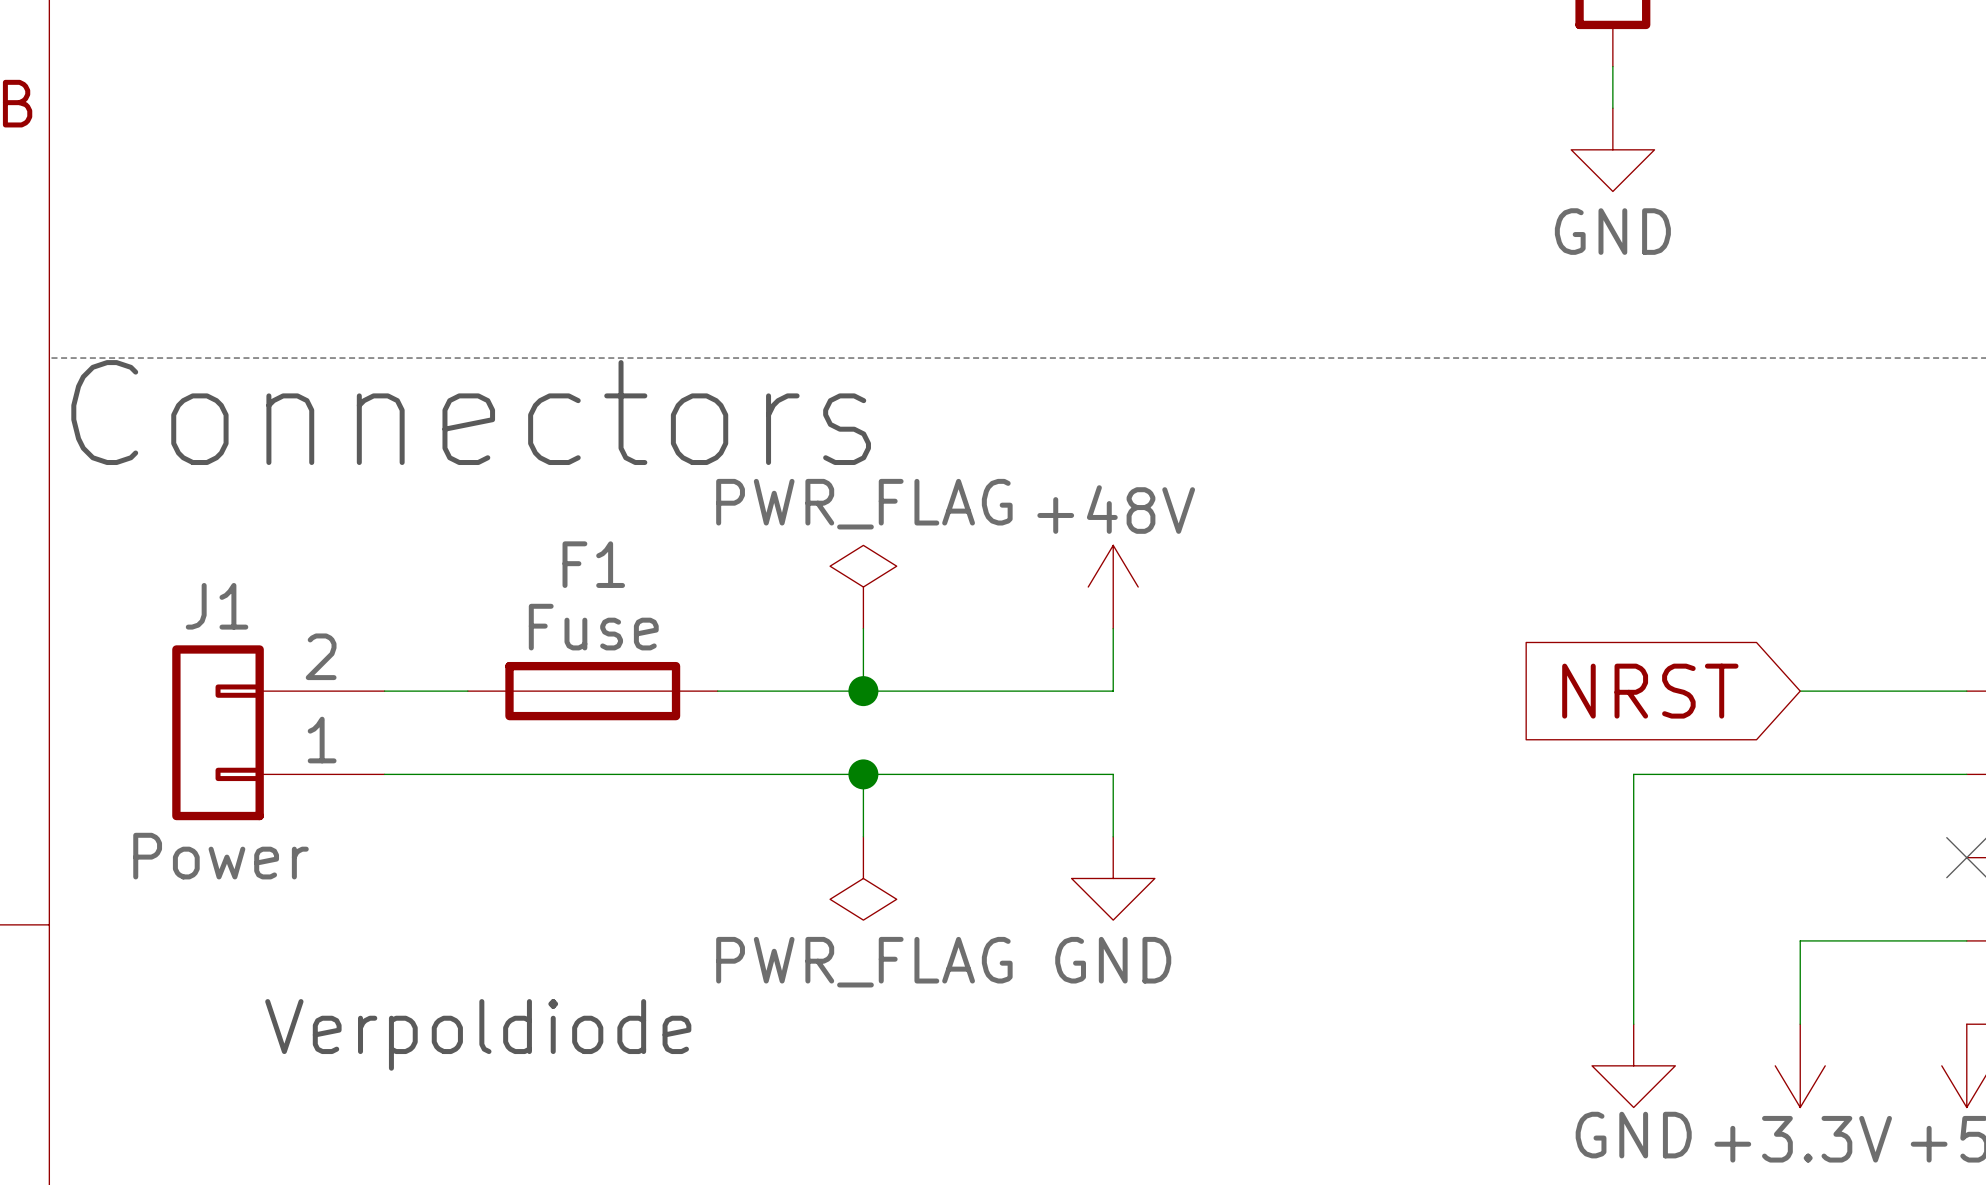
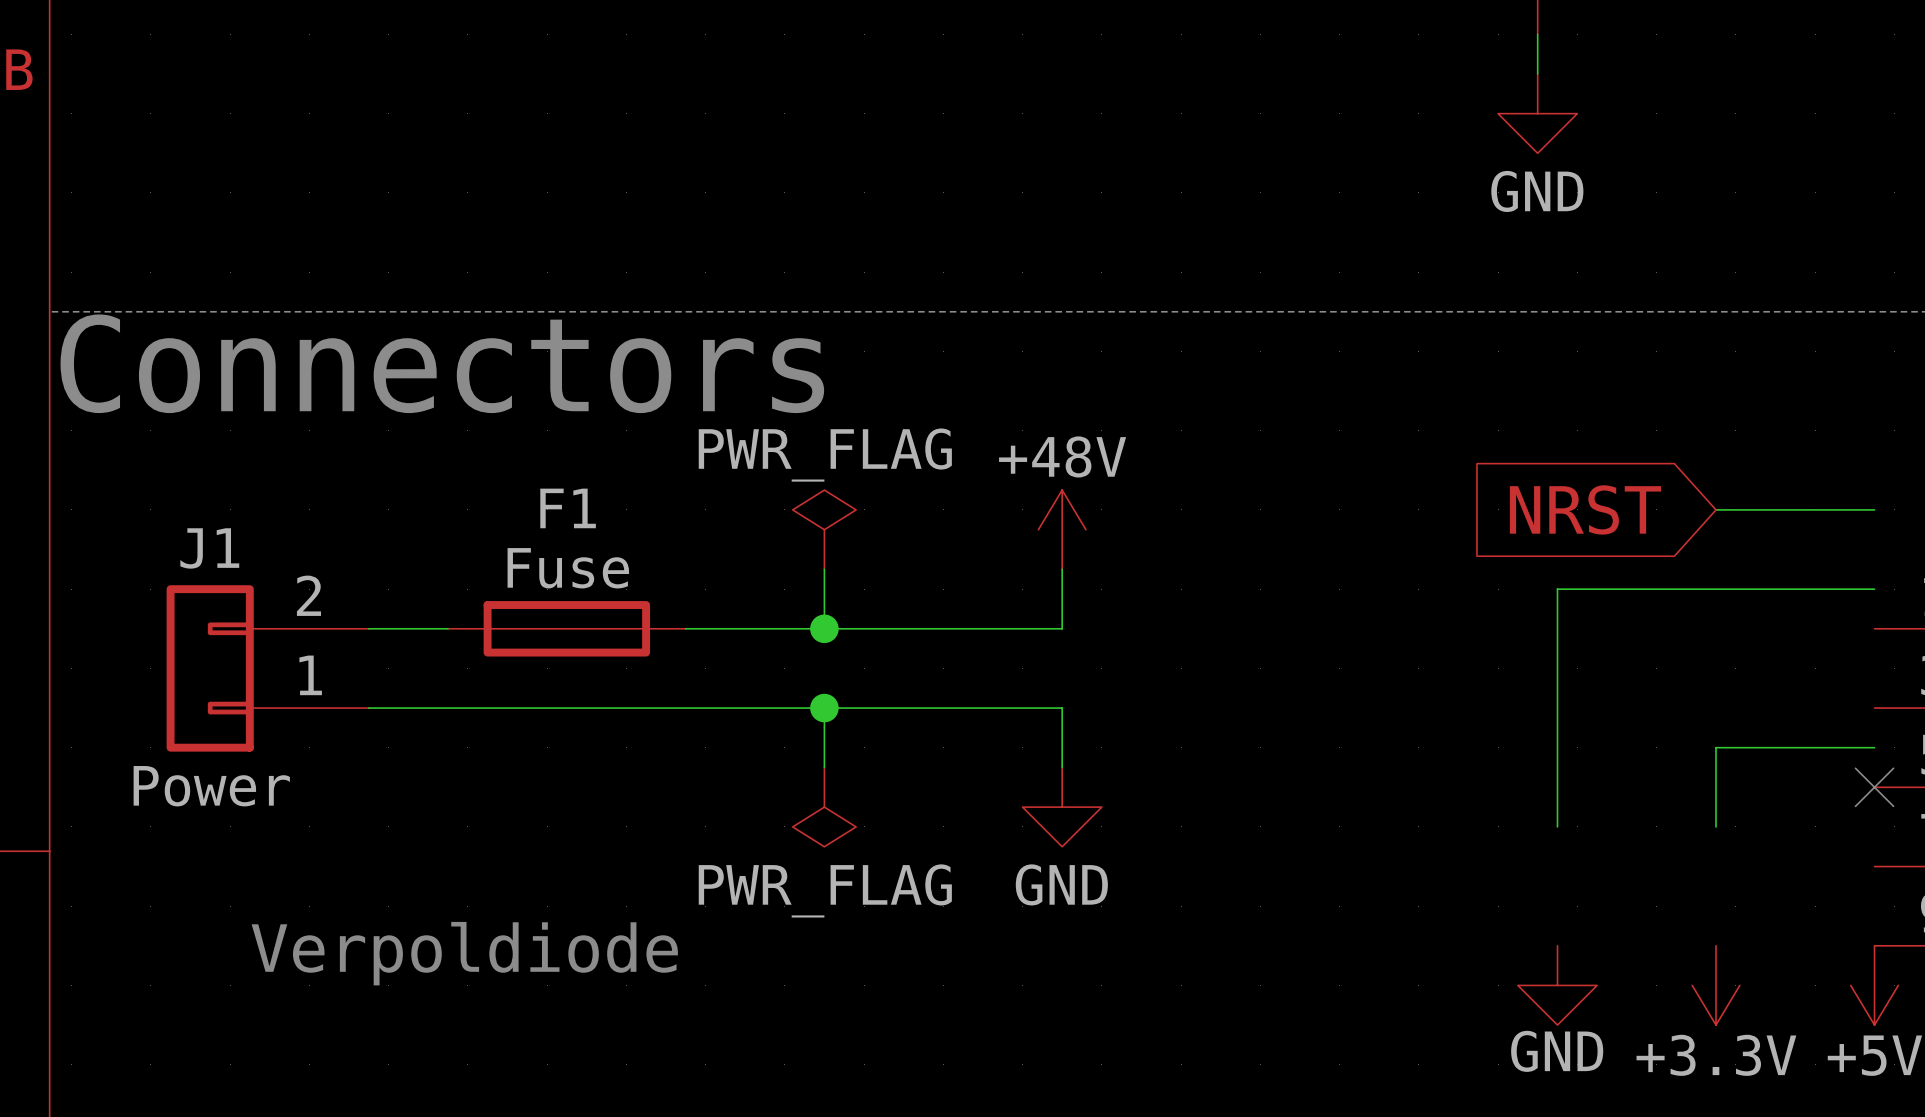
global label position: NRST (1650, 691) -> NRST (1585, 509)
wire: (1800, 691) (1966, 691) -> (1716, 509) (1874, 509)
wire: (1633, 774) (1966, 774) -> (1557, 708) (1557, 589) (1874, 589)
wire: (1633, 899) (1633, 1024) -> none
wire: (1966, 940) (1800, 940) (1800, 1024) -> (1874, 747) (1716, 747) (1716, 826)

